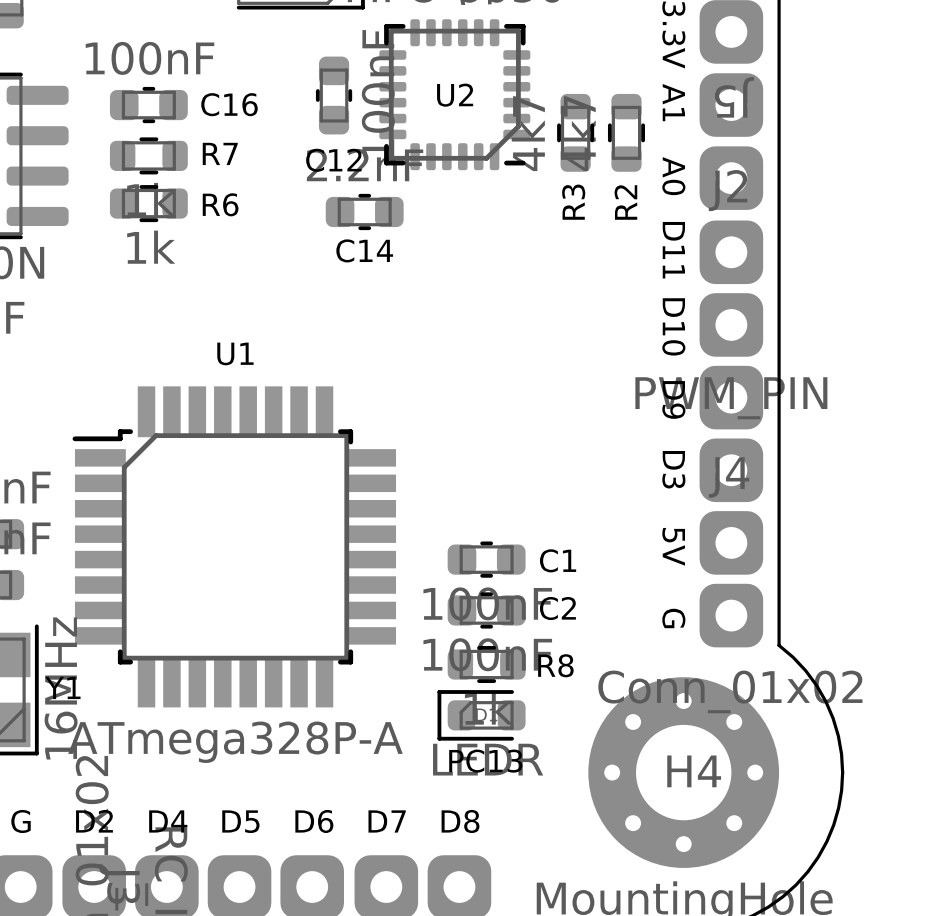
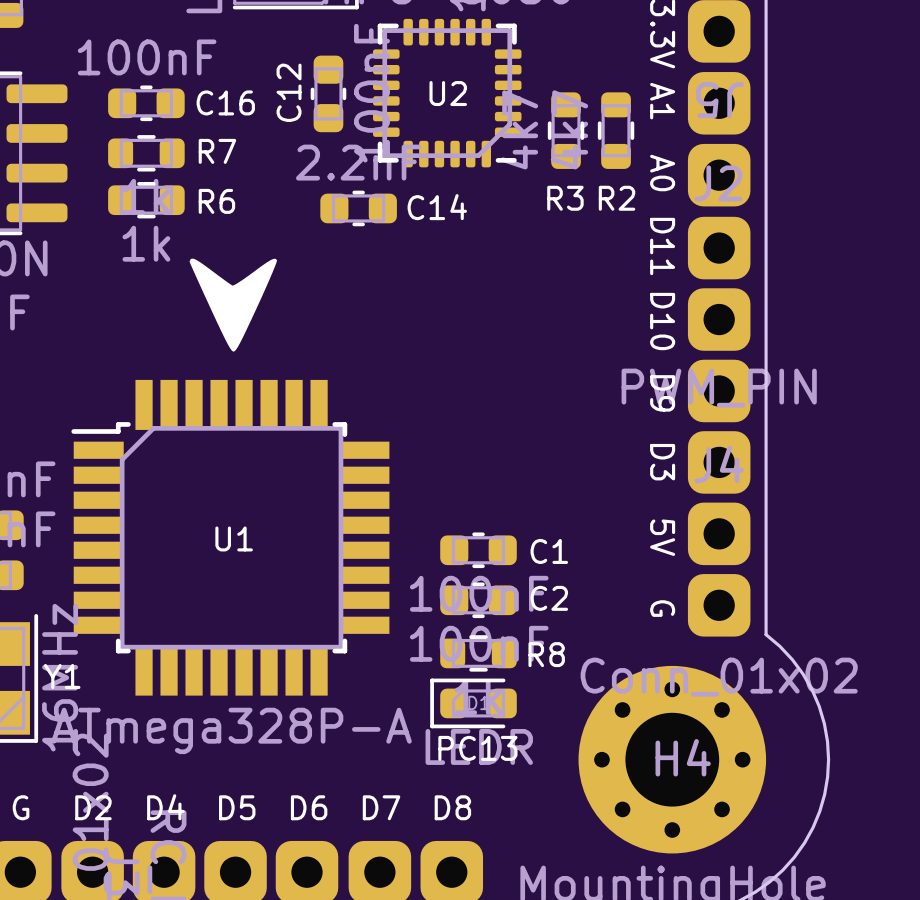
C12 name rotation: 0° (333, 160) -> 90° counterclockwise (289, 92)
R3 name rotation: 0° (573, 202) -> 90° clockwise (565, 198)
R2 name rotation: 0° (625, 202) -> 90° clockwise (617, 198)
C14 name position: C14 (364, 250) -> C14 (437, 207)
drawing: none -> [189, 258, 278, 352]
U1 name position: U1 (235, 353) -> U1 (234, 538)

